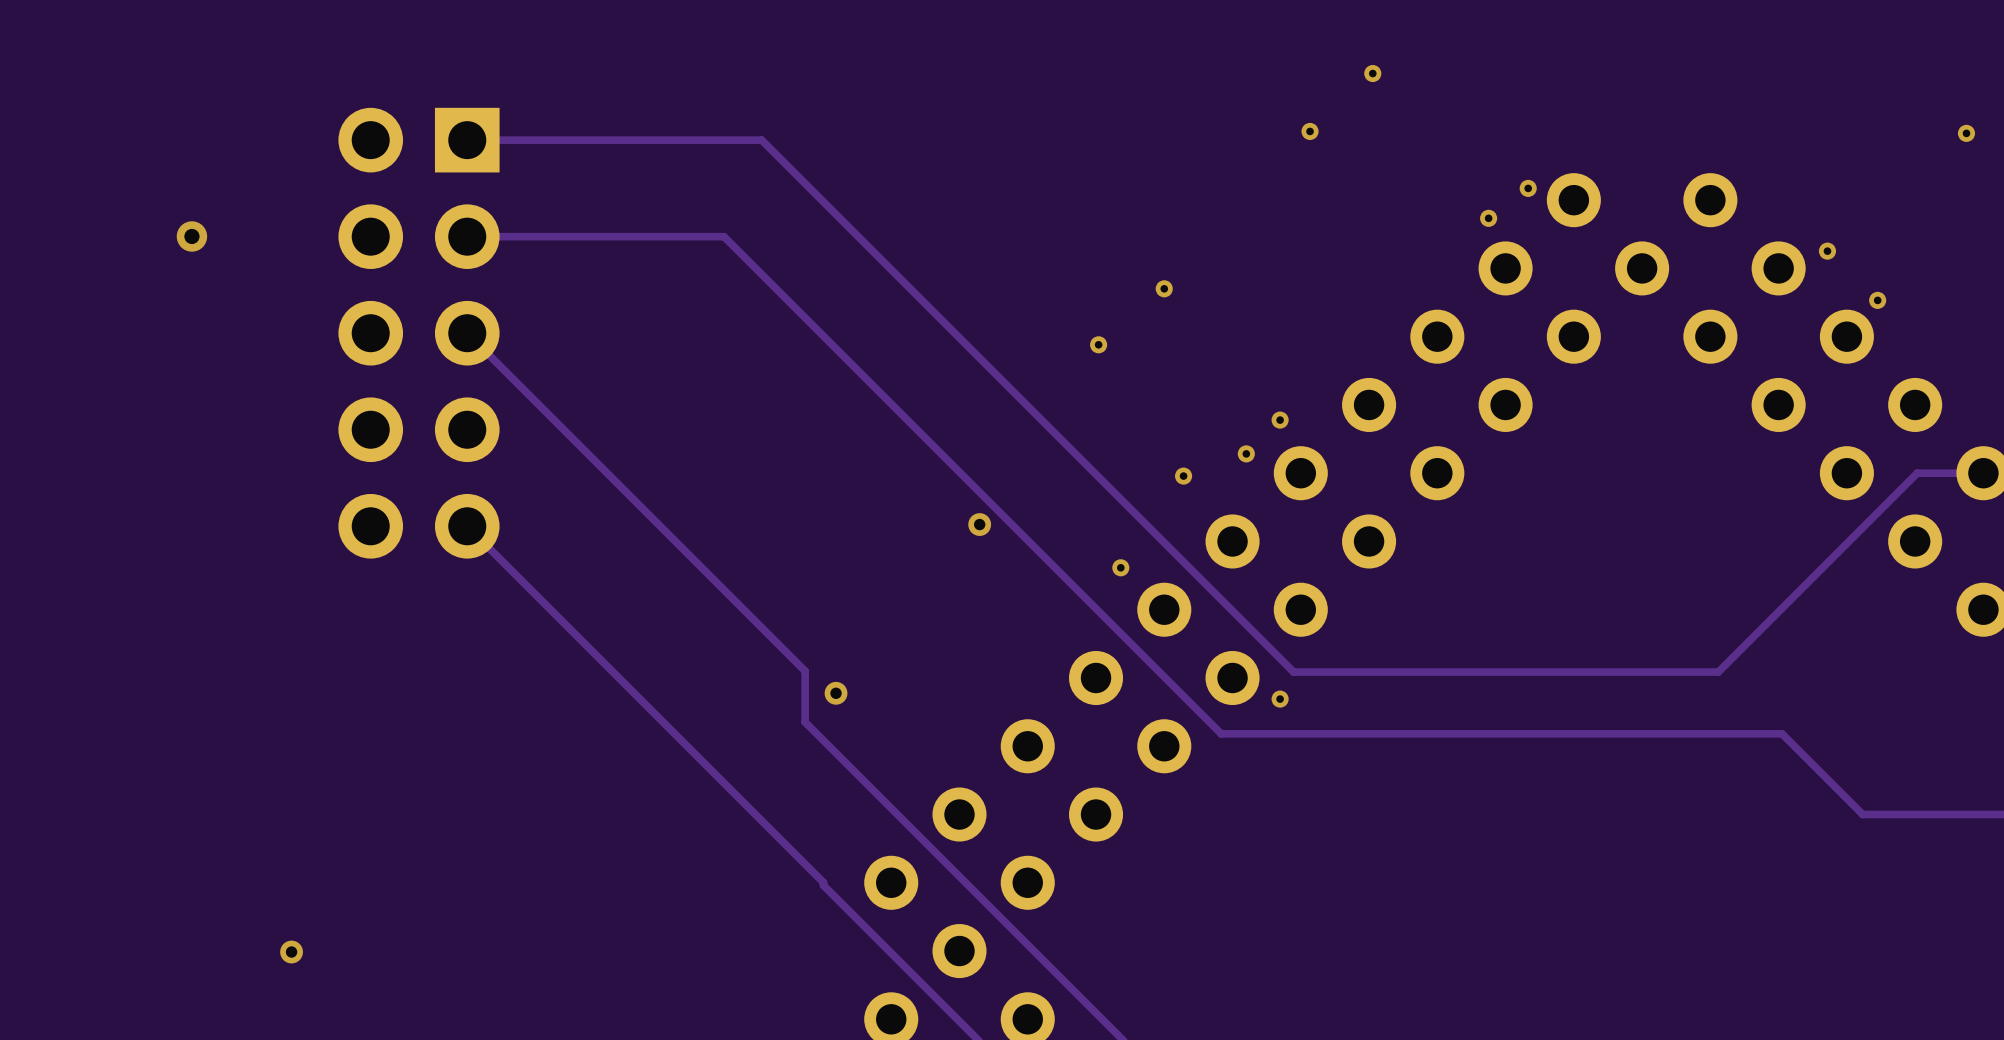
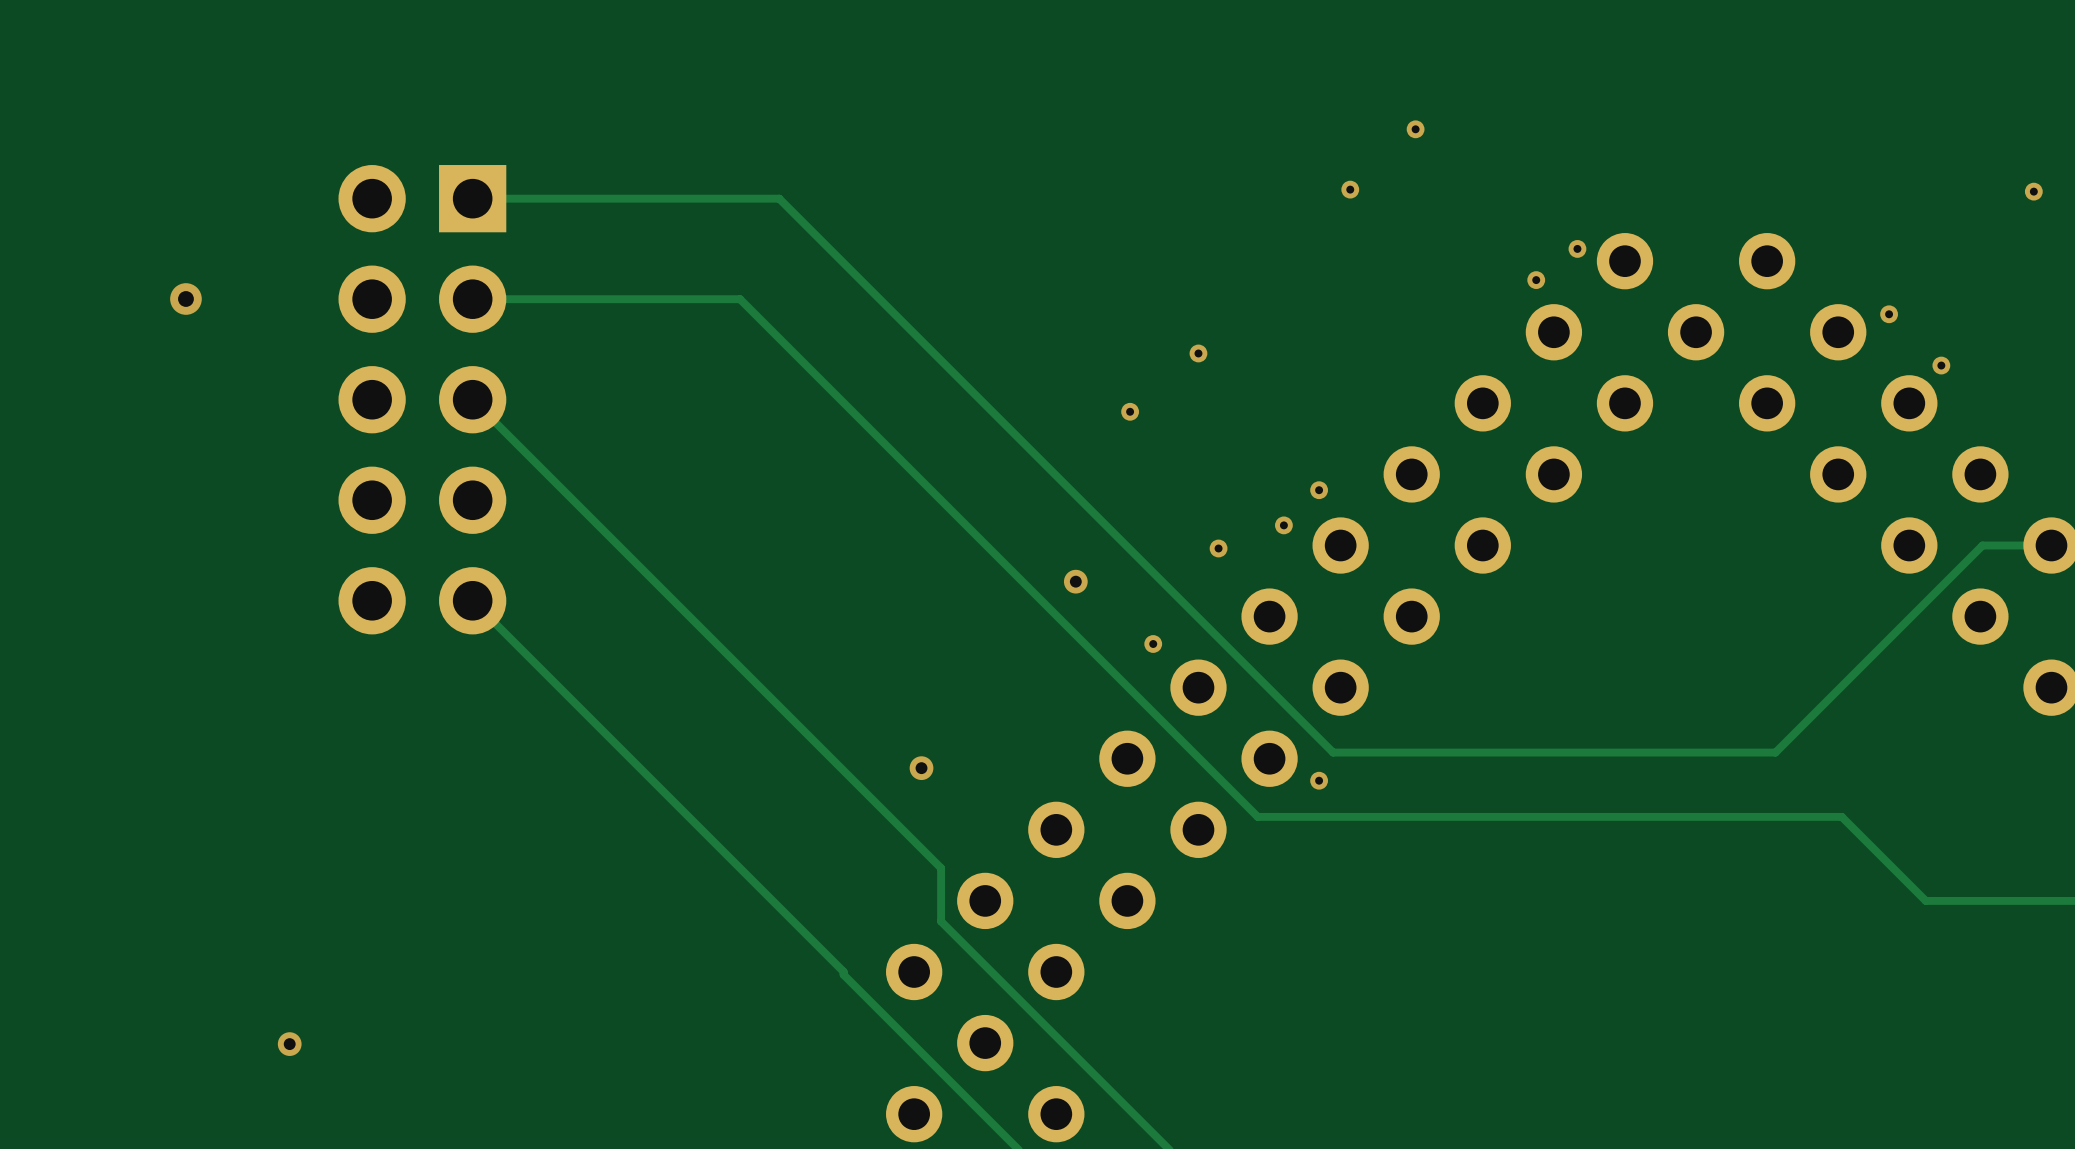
via position: (979, 524) -> (1075, 581)
track: (805, 671) (805, 722) (917, 834) -> (824, 751) (941, 868) (941, 921)
via position: (836, 693) -> (921, 768)

